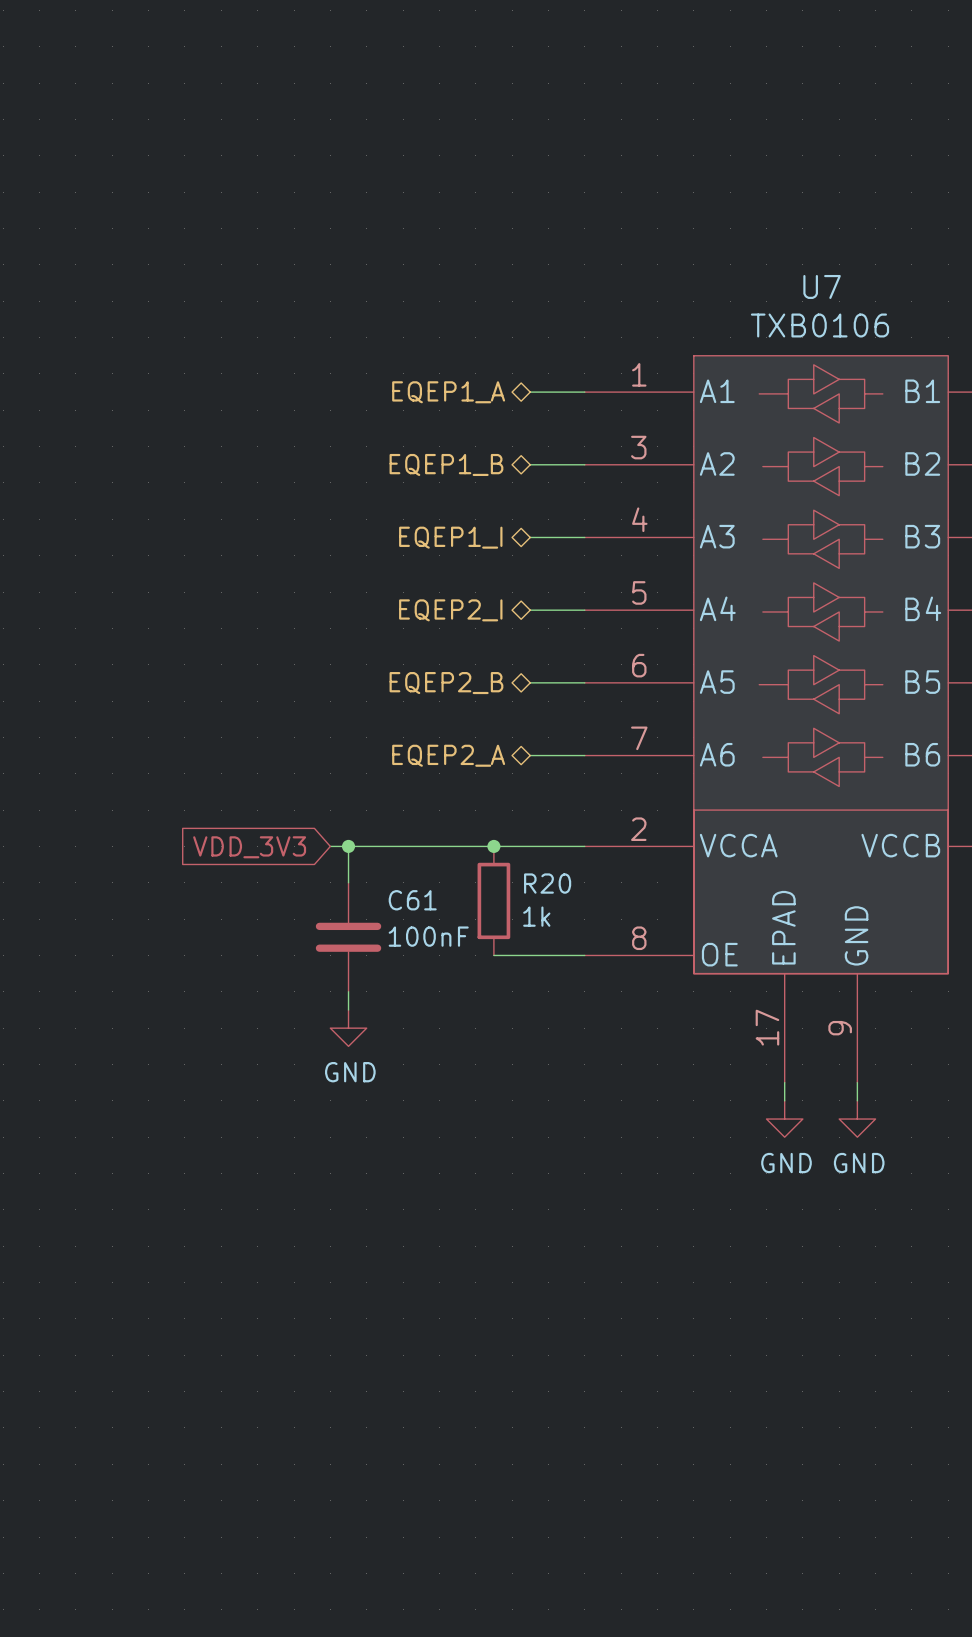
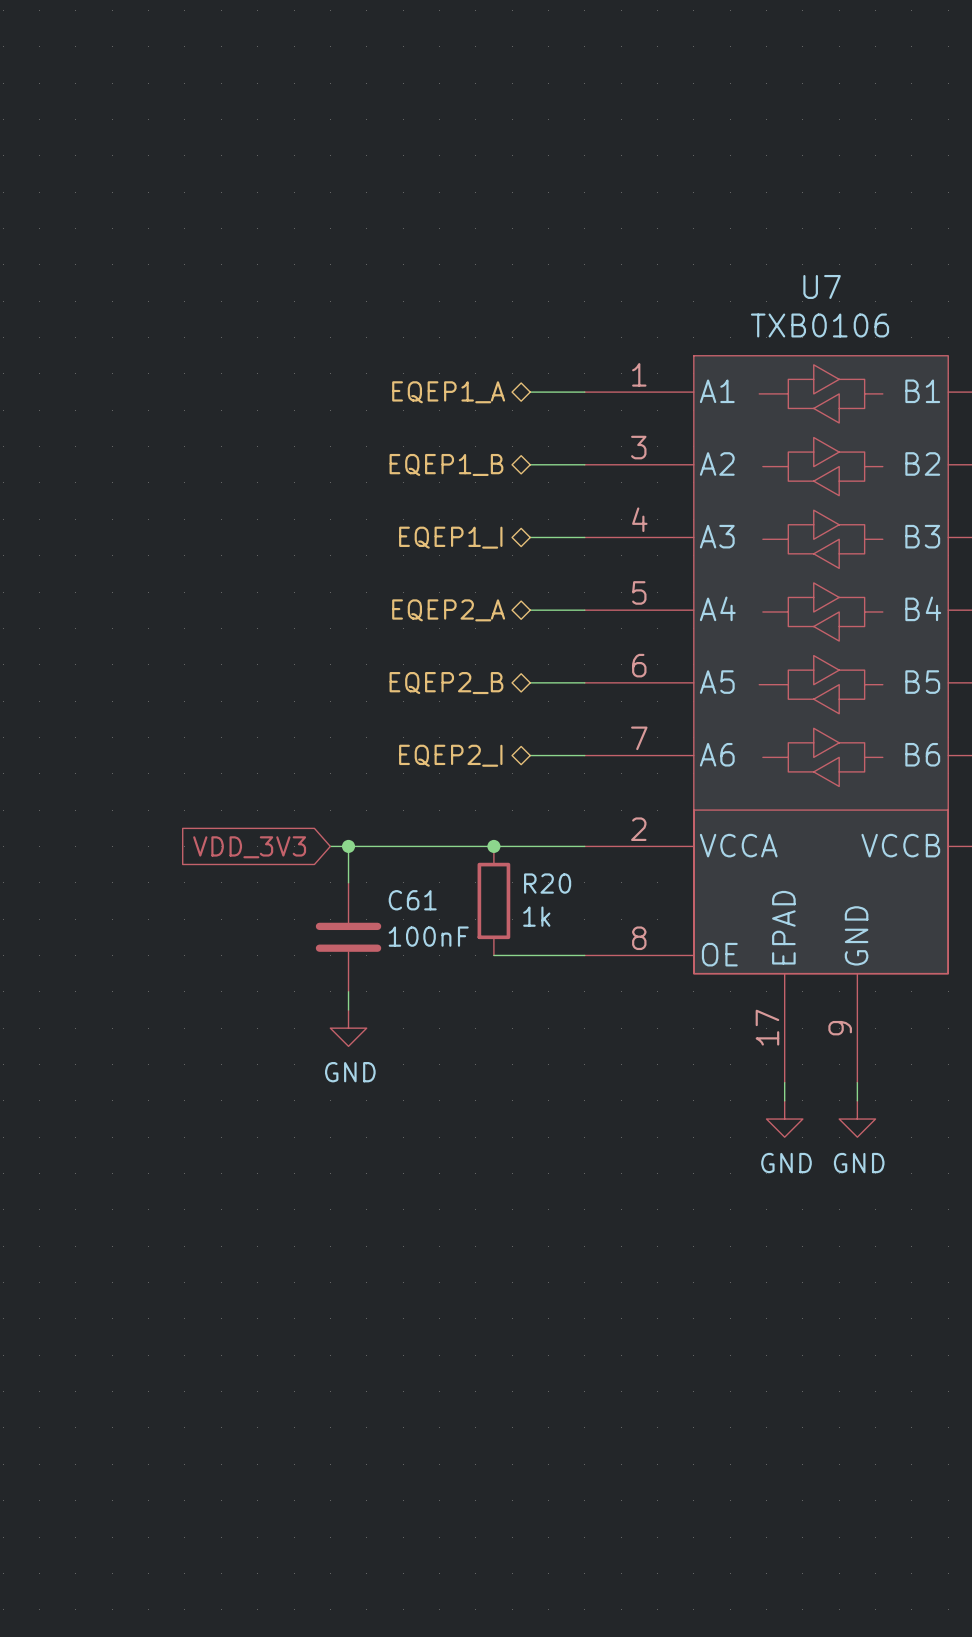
hierarchical label: EQEP2_I (450, 610) -> EQEP2_A (448, 610)
hierarchical label: EQEP2_A (448, 755) -> EQEP2_I (450, 755)

